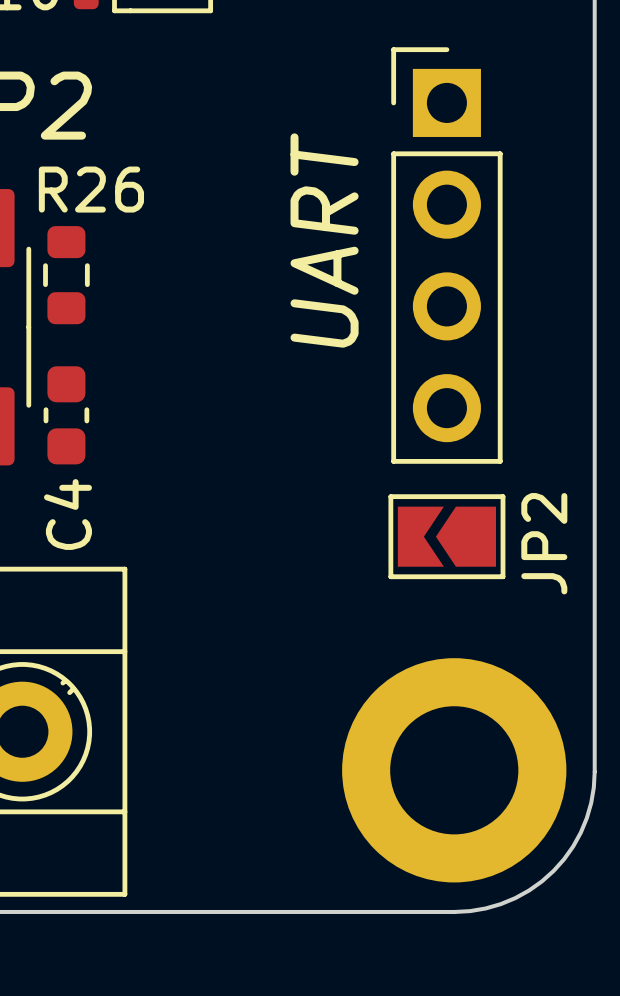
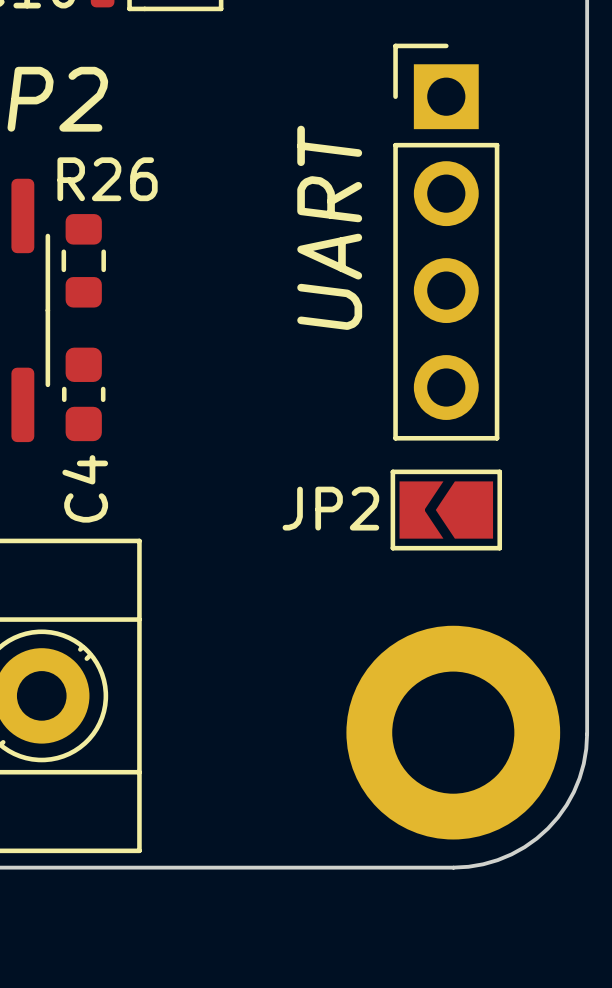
JP2 name rotation: 0° (544, 543) -> 90° clockwise (330, 508)
JP2 name position: JP2 (544, 543) -> JP2 (330, 508)

